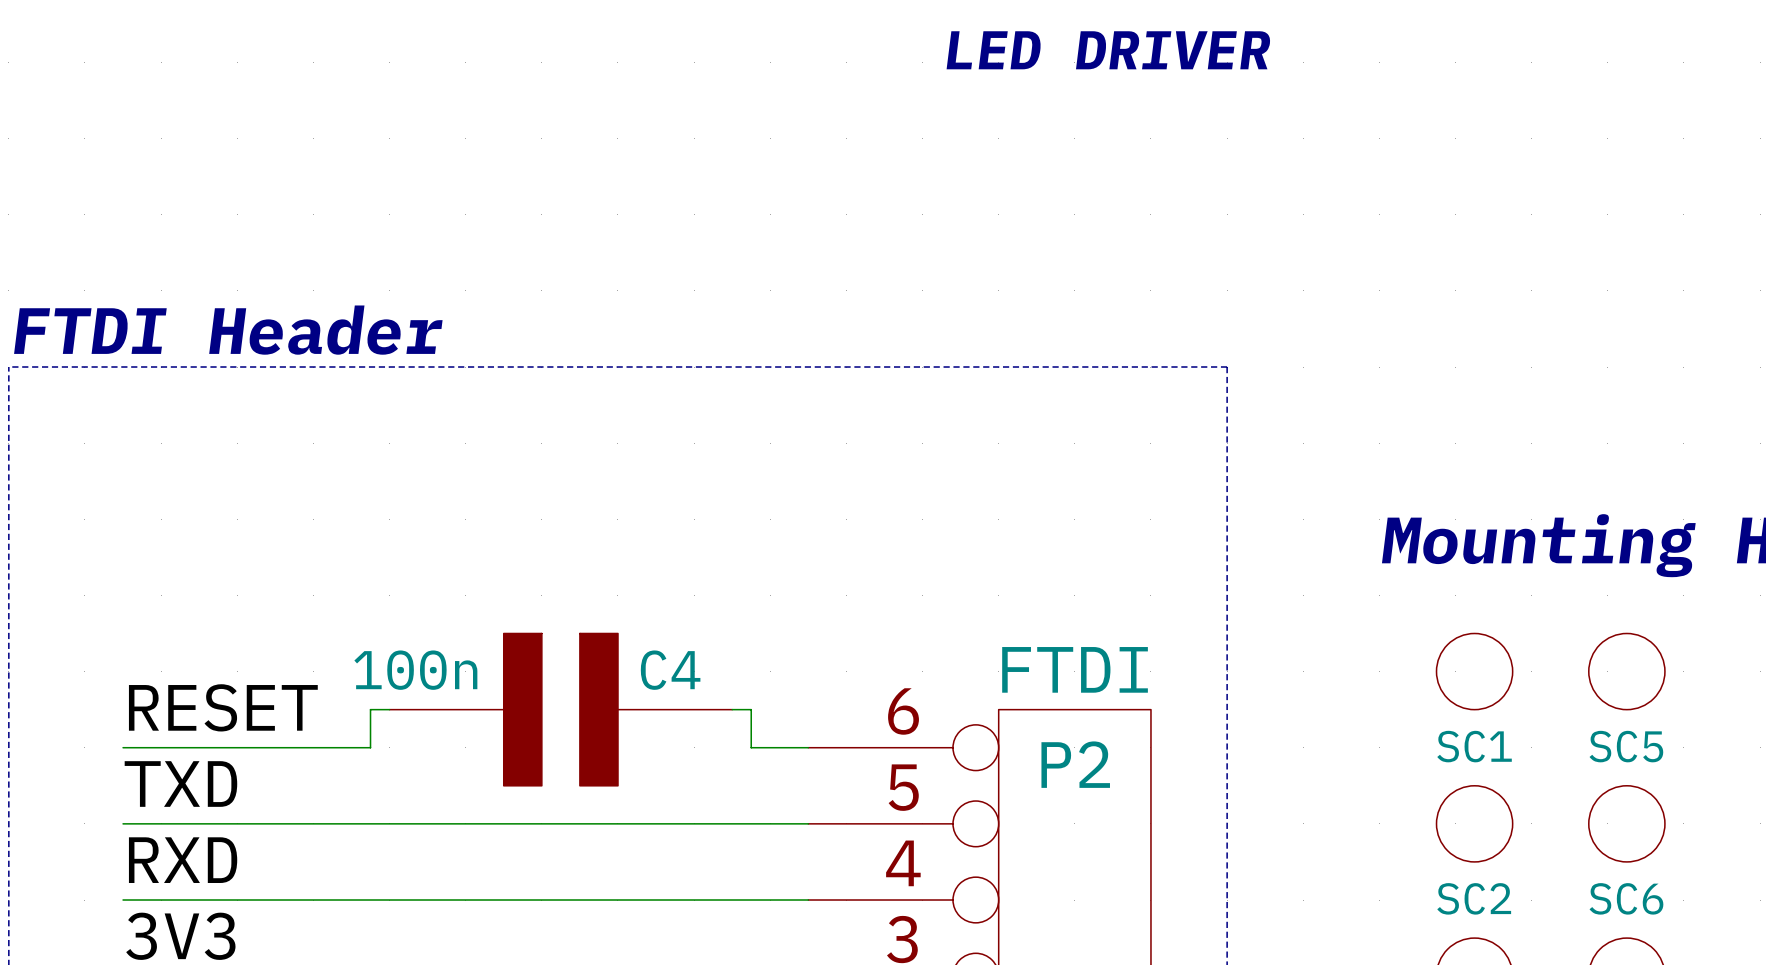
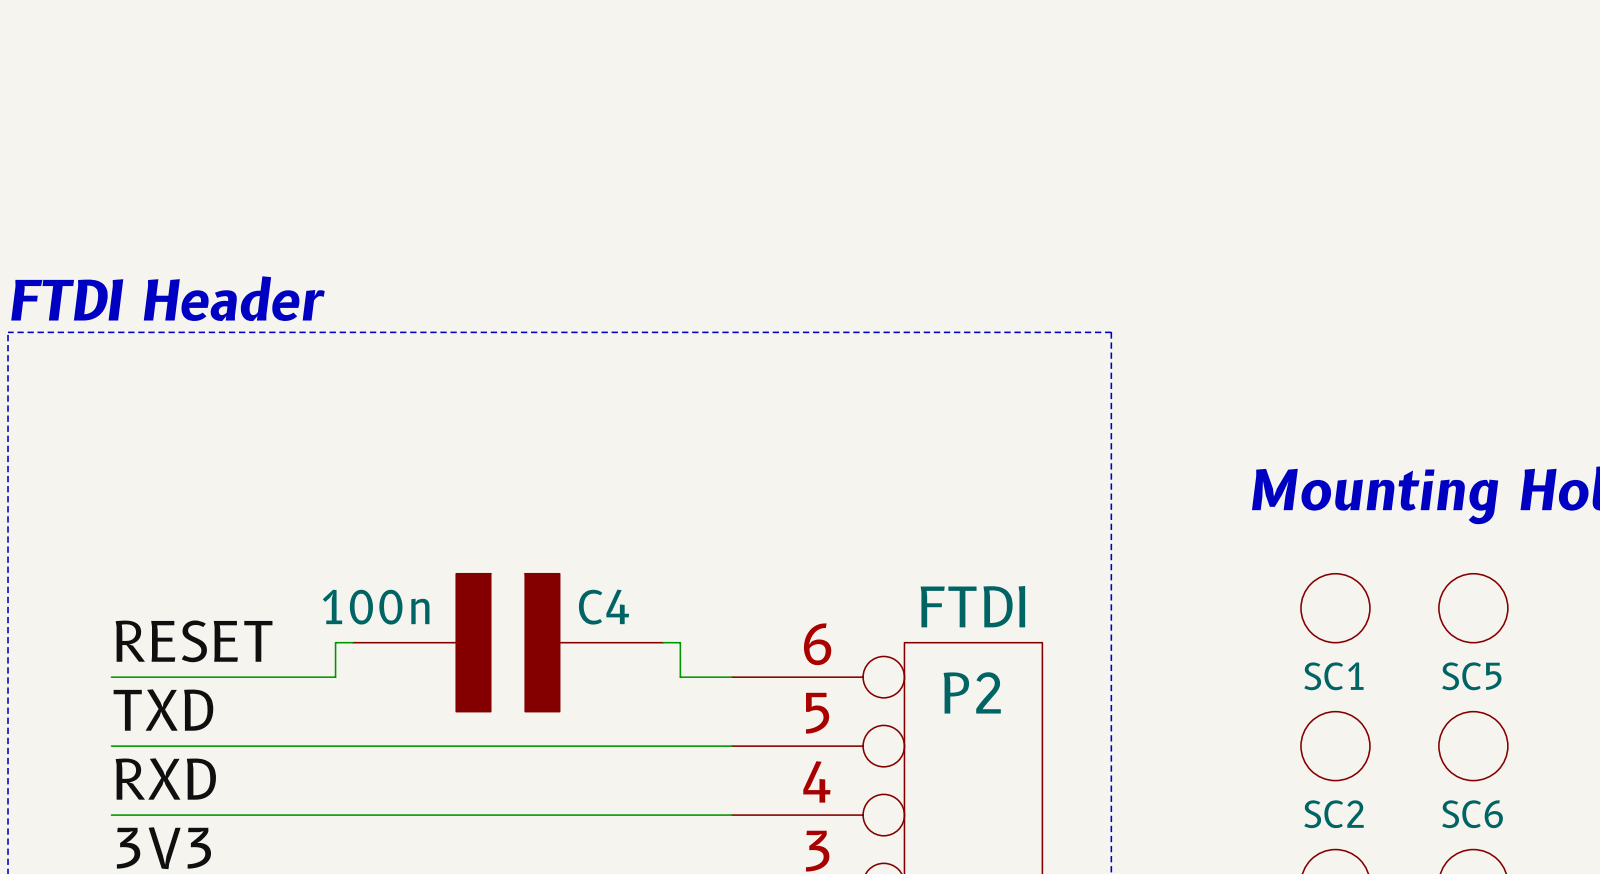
text: LED DRIVER (1108, 50) -> none

